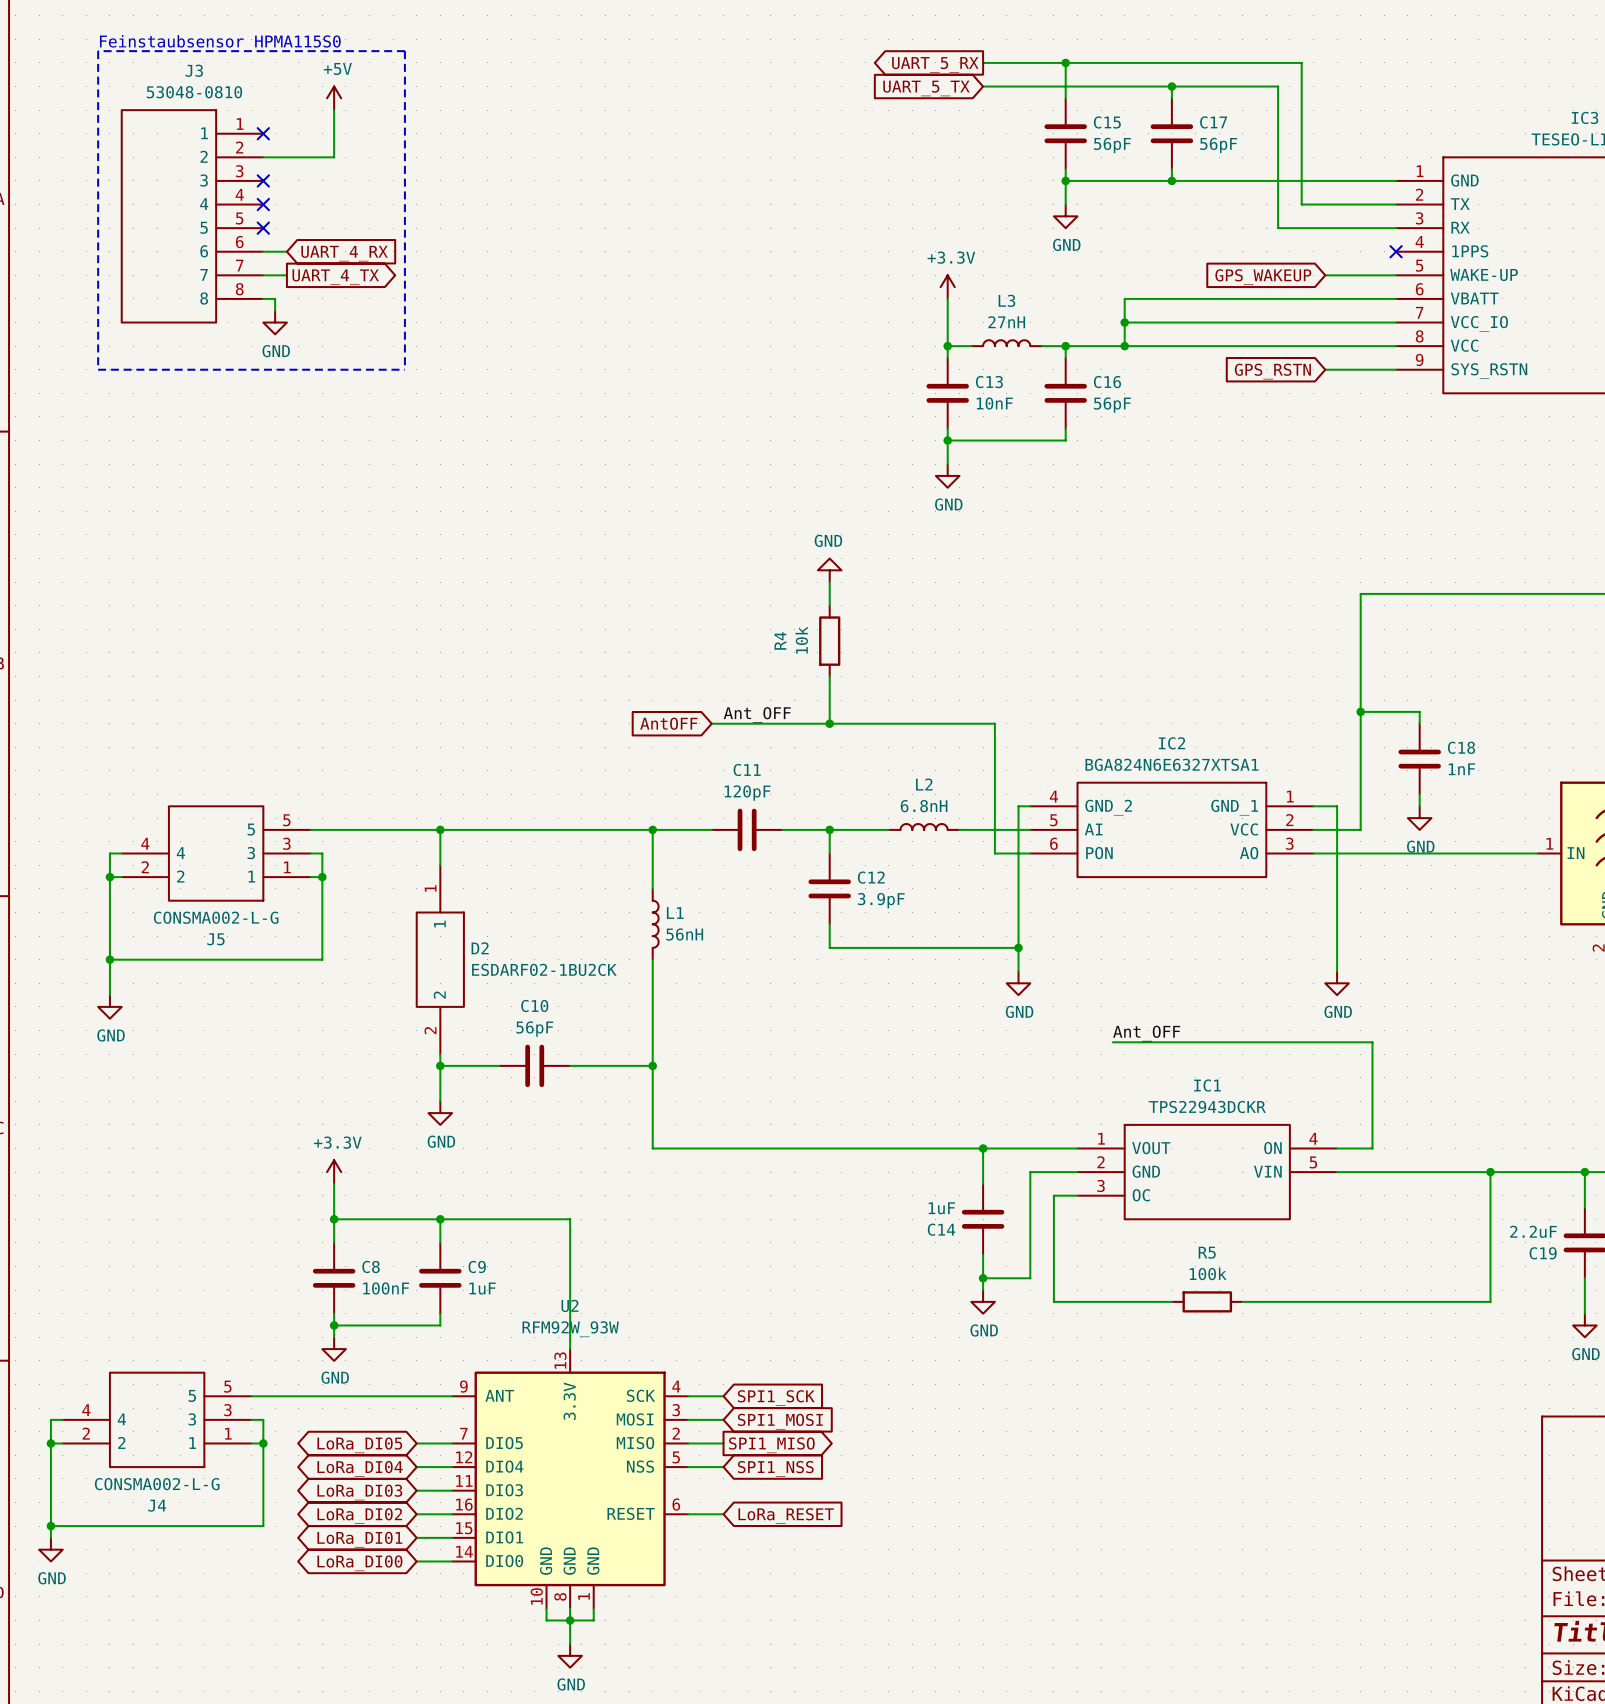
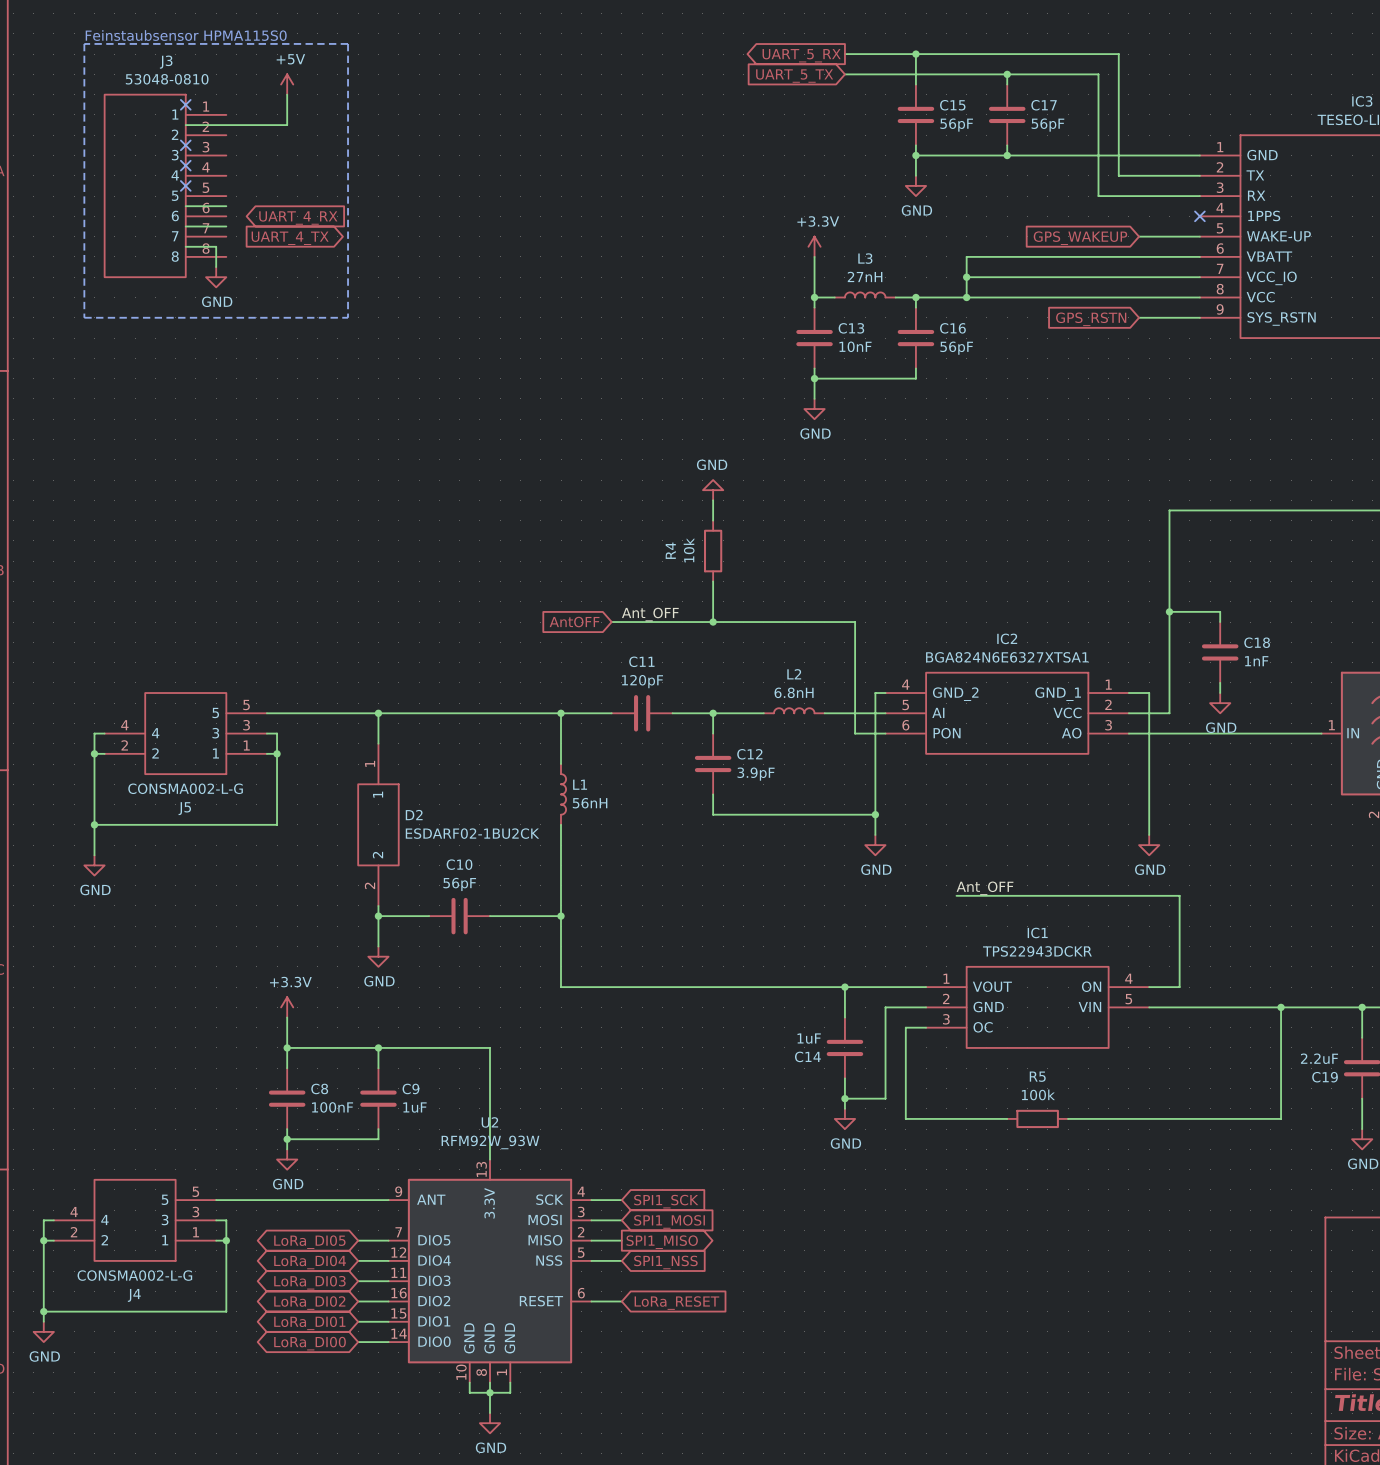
no-connect mark: none -> (185, 104)
no-connect mark: (263, 133) -> none
wire: (334, 145) (334, 157) (263, 157) -> (287, 125) (185, 125)
no-connect mark: none -> (185, 145)
no-connect mark: (263, 180) -> none
no-connect mark: none -> (185, 165)
no-connect mark: (263, 204) -> none
no-connect mark: none -> (185, 185)
no-connect mark: (263, 228) -> none
wire: none -> (185, 206) (226, 206)
wire: (263, 251) (286, 251) -> none
wire: none -> (185, 226) (226, 226)
wire: (263, 275) (286, 275) -> none
wire: none -> (185, 246) (216, 246) (216, 267)
wire: (263, 298) (275, 298) (275, 310) -> none
power symbol position: GND (275, 322) -> GND (216, 277)

